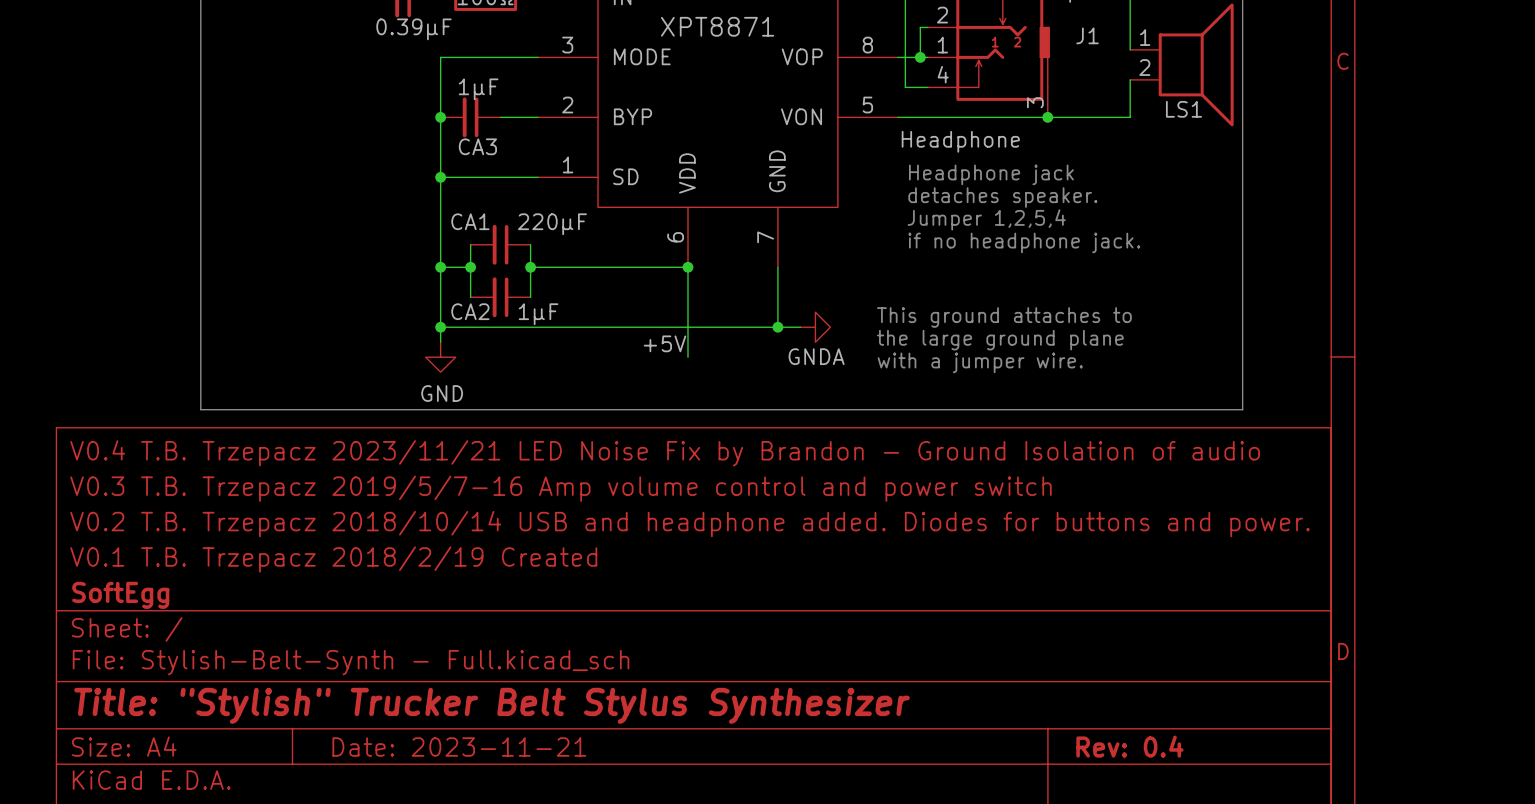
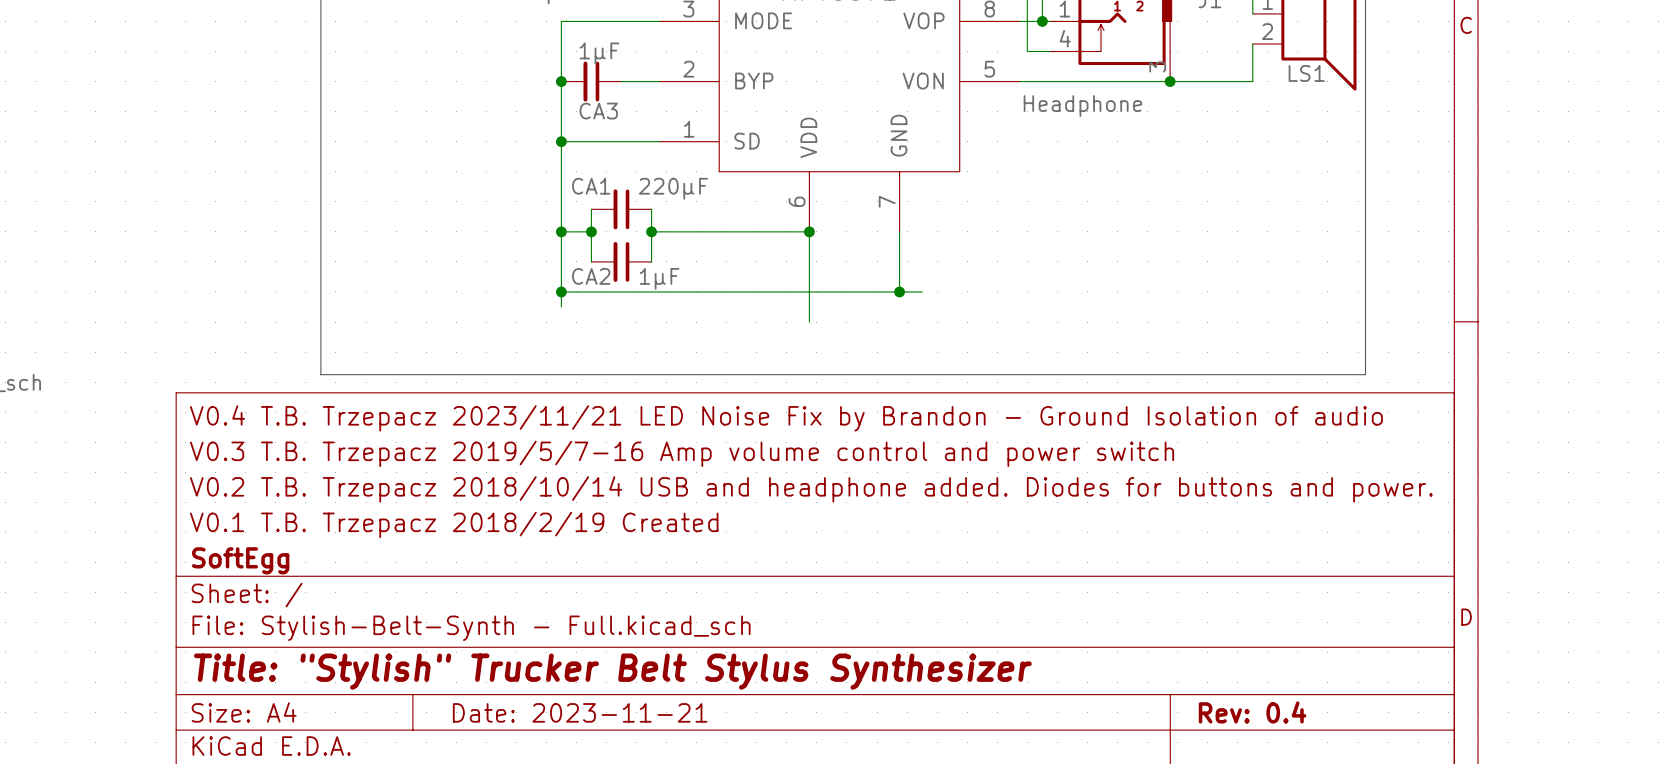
text: Headphone jack (991, 174) -> none
text: detaches speaker. (1002, 197) -> none
text: Jumper 1,2,5,4 (986, 219) -> none
text: if no headphone jack. (1024, 242) -> none
text: This ground attaches to (1004, 317) -> none
power symbol: GNDA (815, 327) -> none
text: the large ground plane (1000, 340) -> none
label: +5V (665, 343) -> none
power symbol: GND (440, 357) -> none
text: with a jumper wire. (980, 362) -> none

